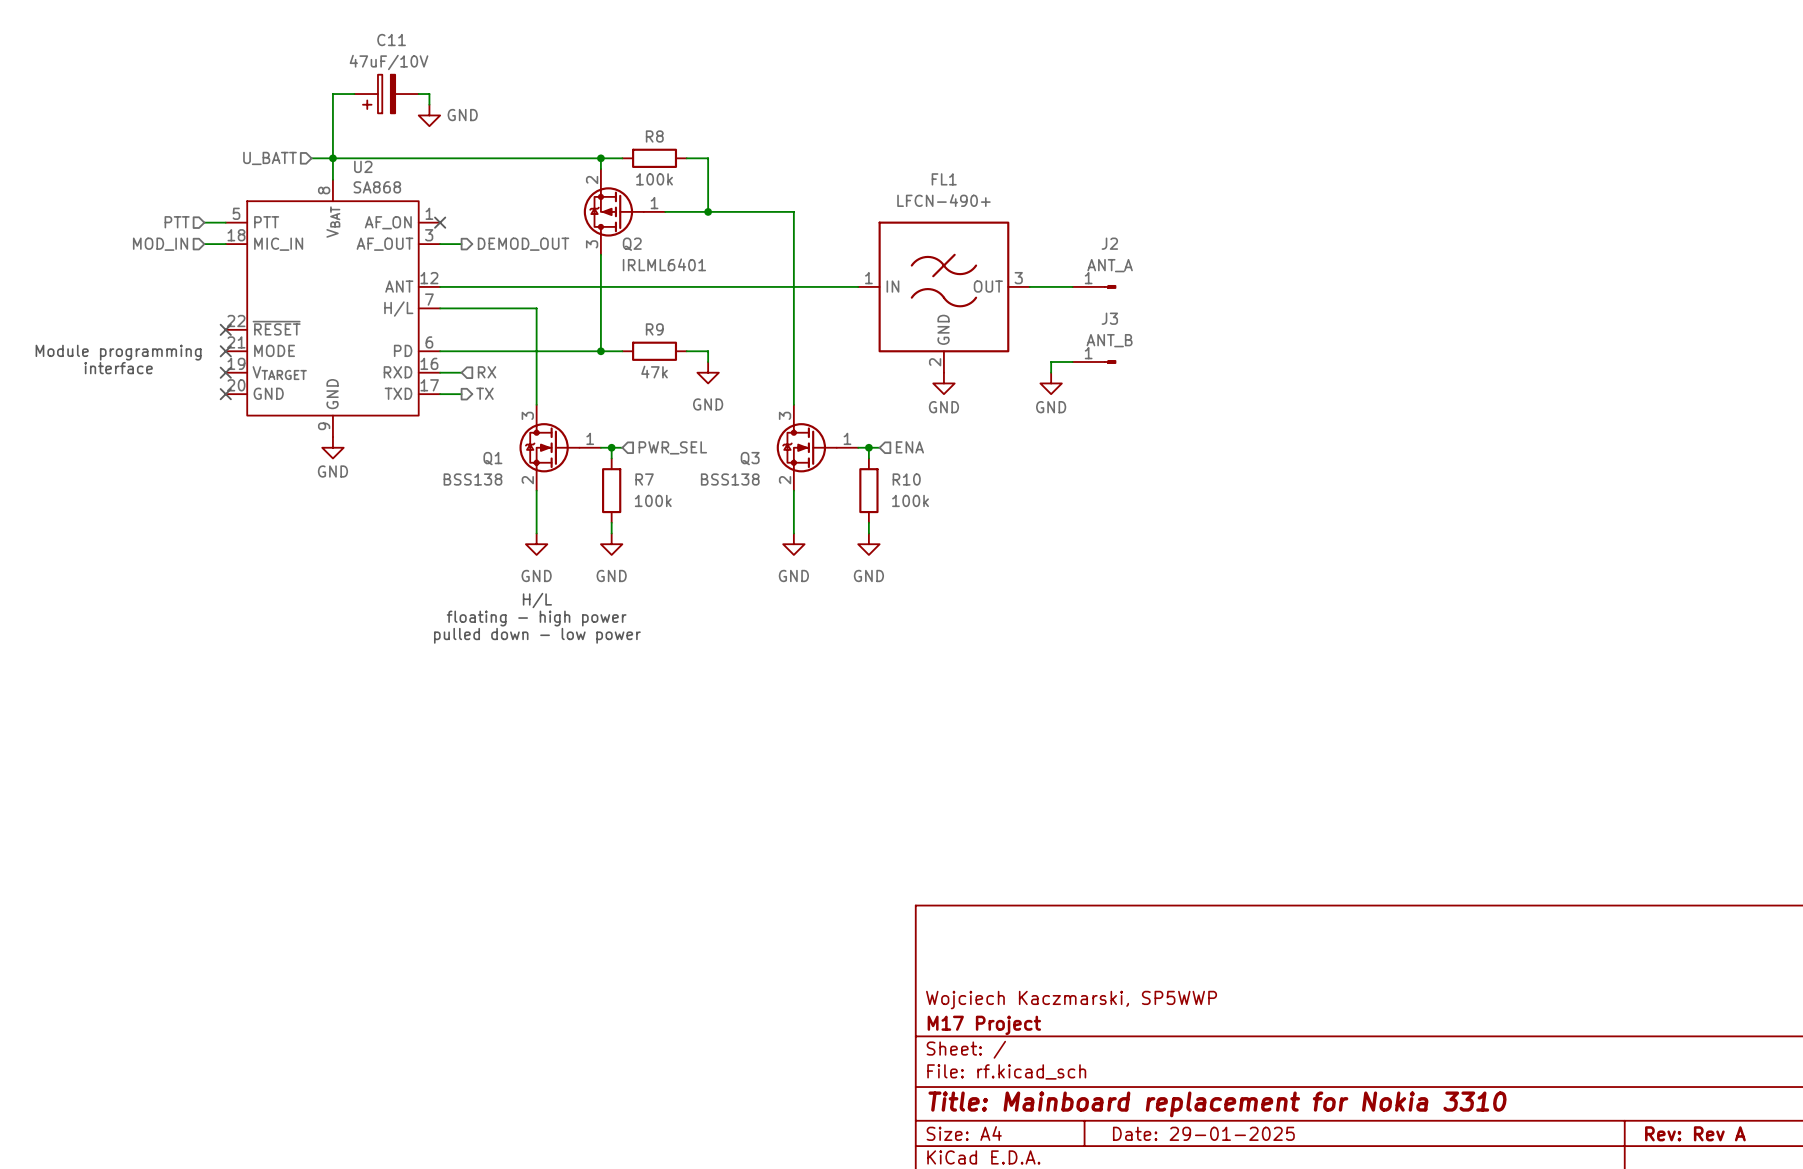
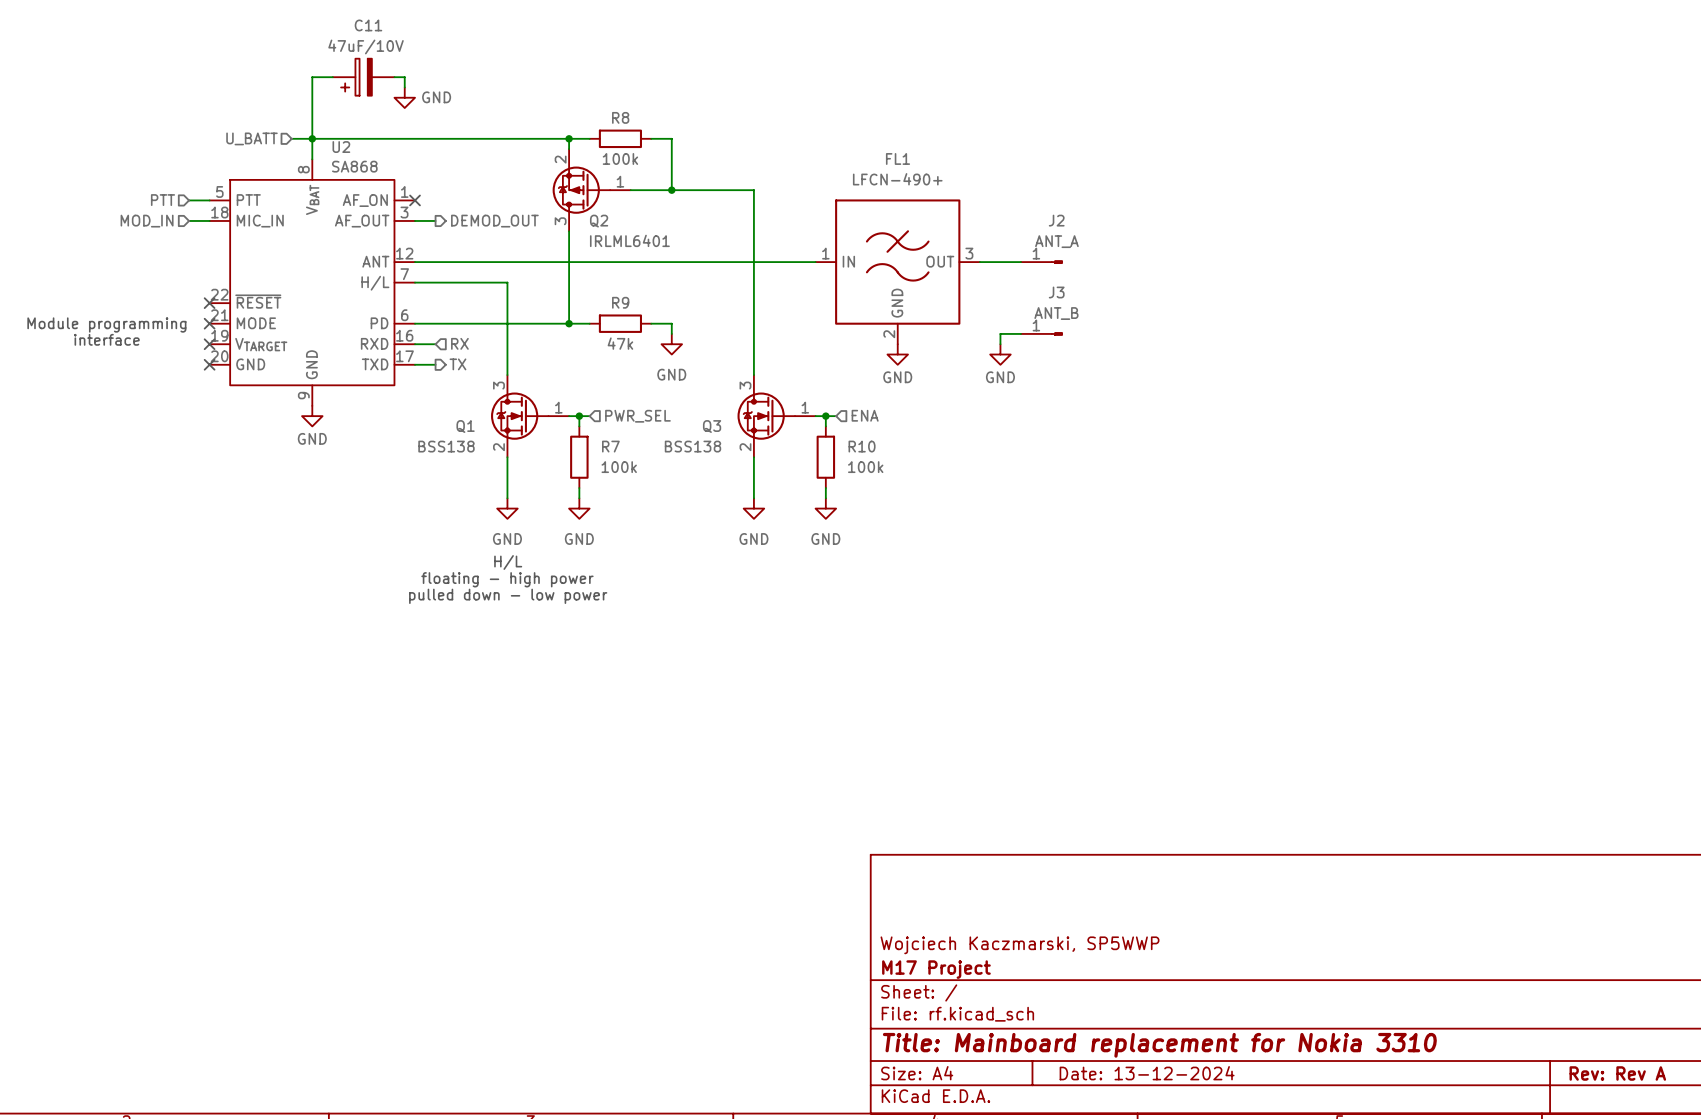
title block: Date: 29-01-2025 (1203, 1133) -> Date: 13-12-2024 (1147, 1073)

